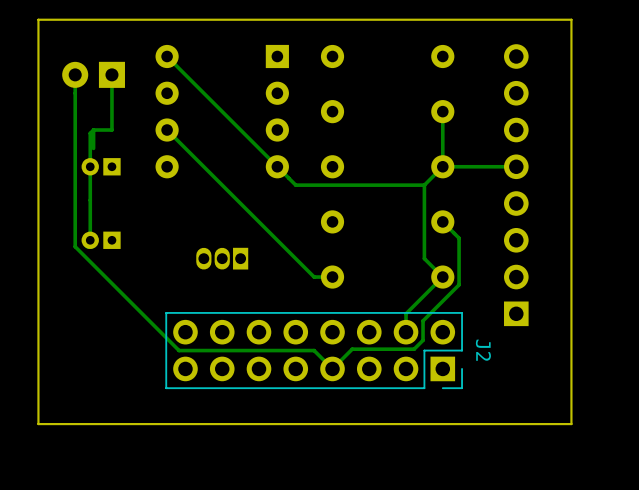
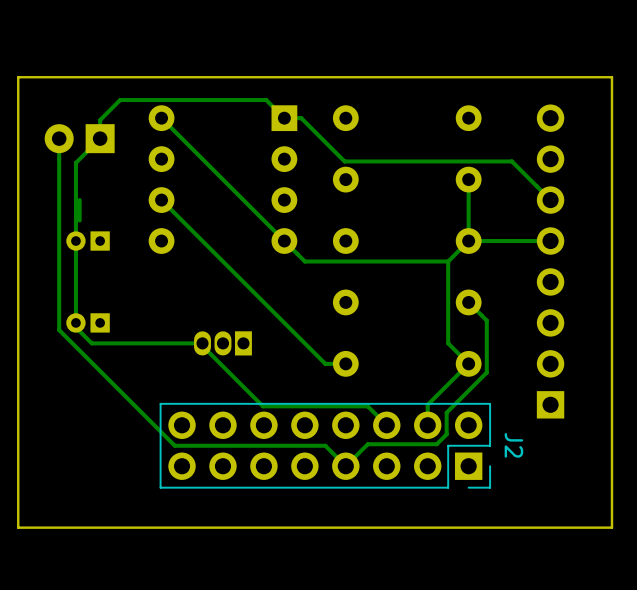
track: none -> (284, 118) (301, 118) (344, 161) (511, 161) (550, 200)
track: (111, 74) (111, 130) (93, 130) (90, 133) -> (279, 113) (266, 100) (120, 100) (100, 120) (100, 138) (75, 162) (75, 203)
track: none -> (78, 330) (91, 343) (202, 343)
track: none -> (208, 351) (262, 406) (367, 406) (386, 425)

